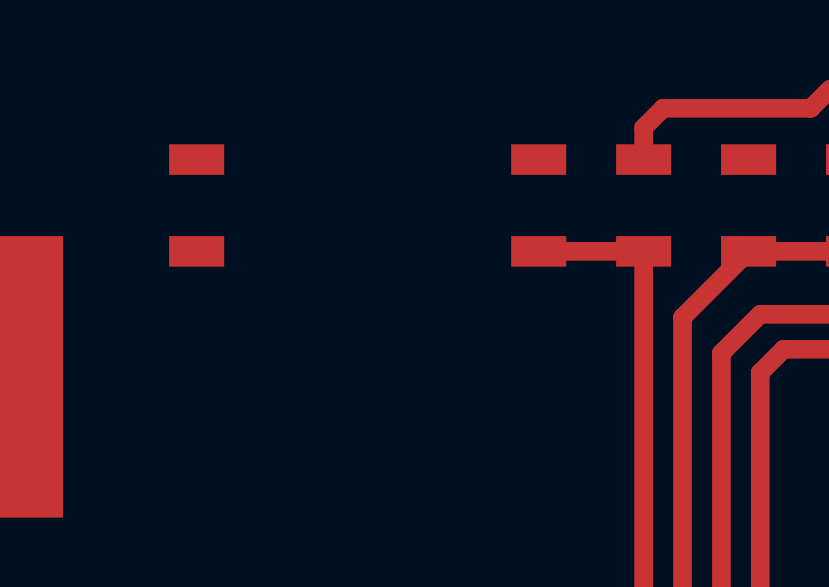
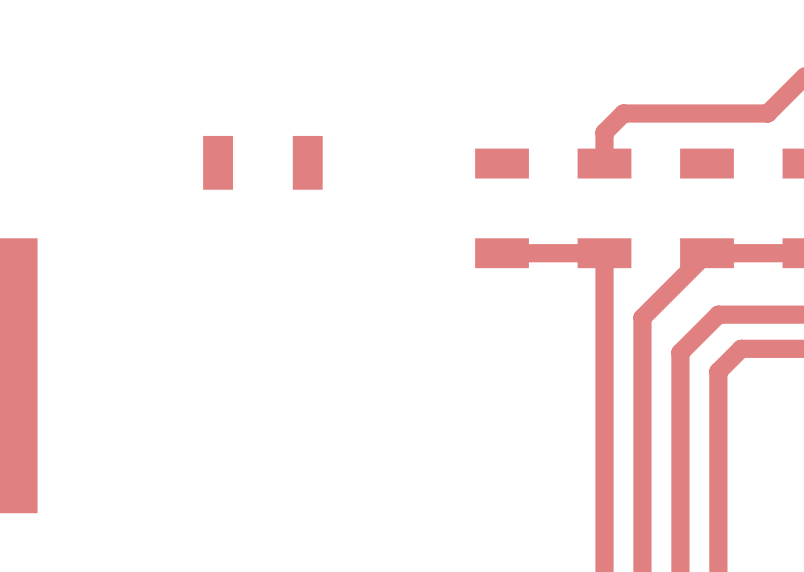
part rotation: 0° (196, 205) -> 90° clockwise (262, 162)
part position: (196, 205) -> (262, 162)

